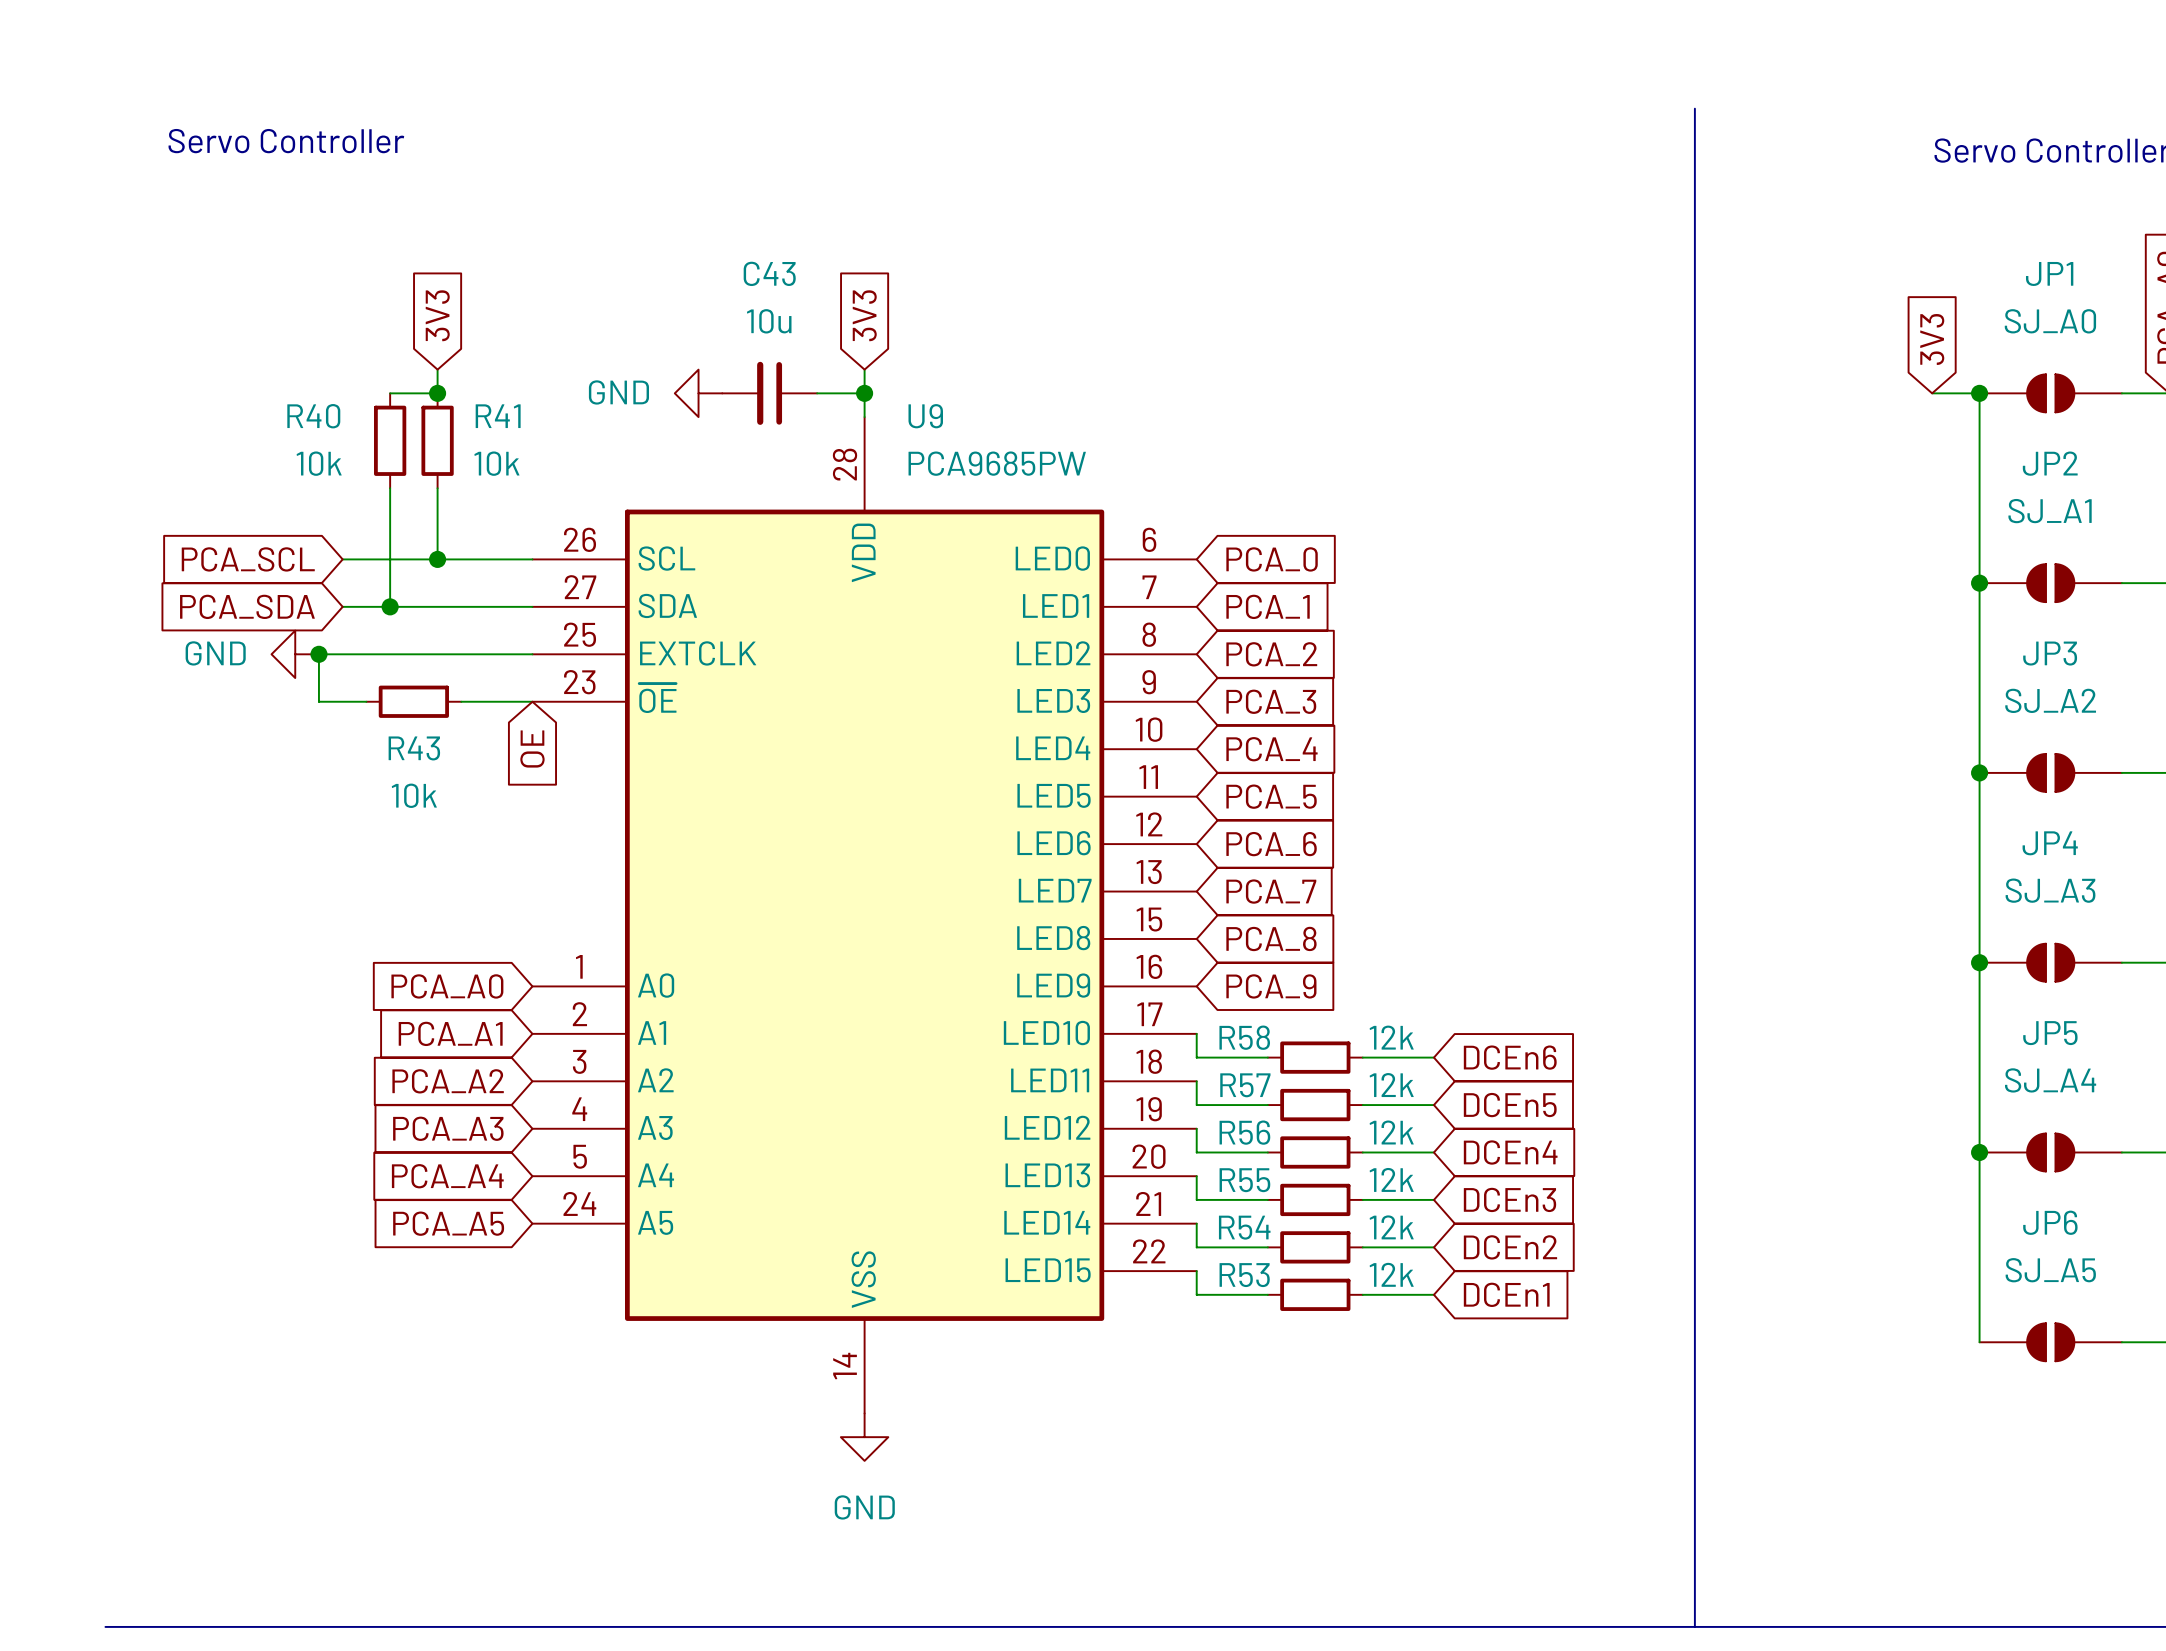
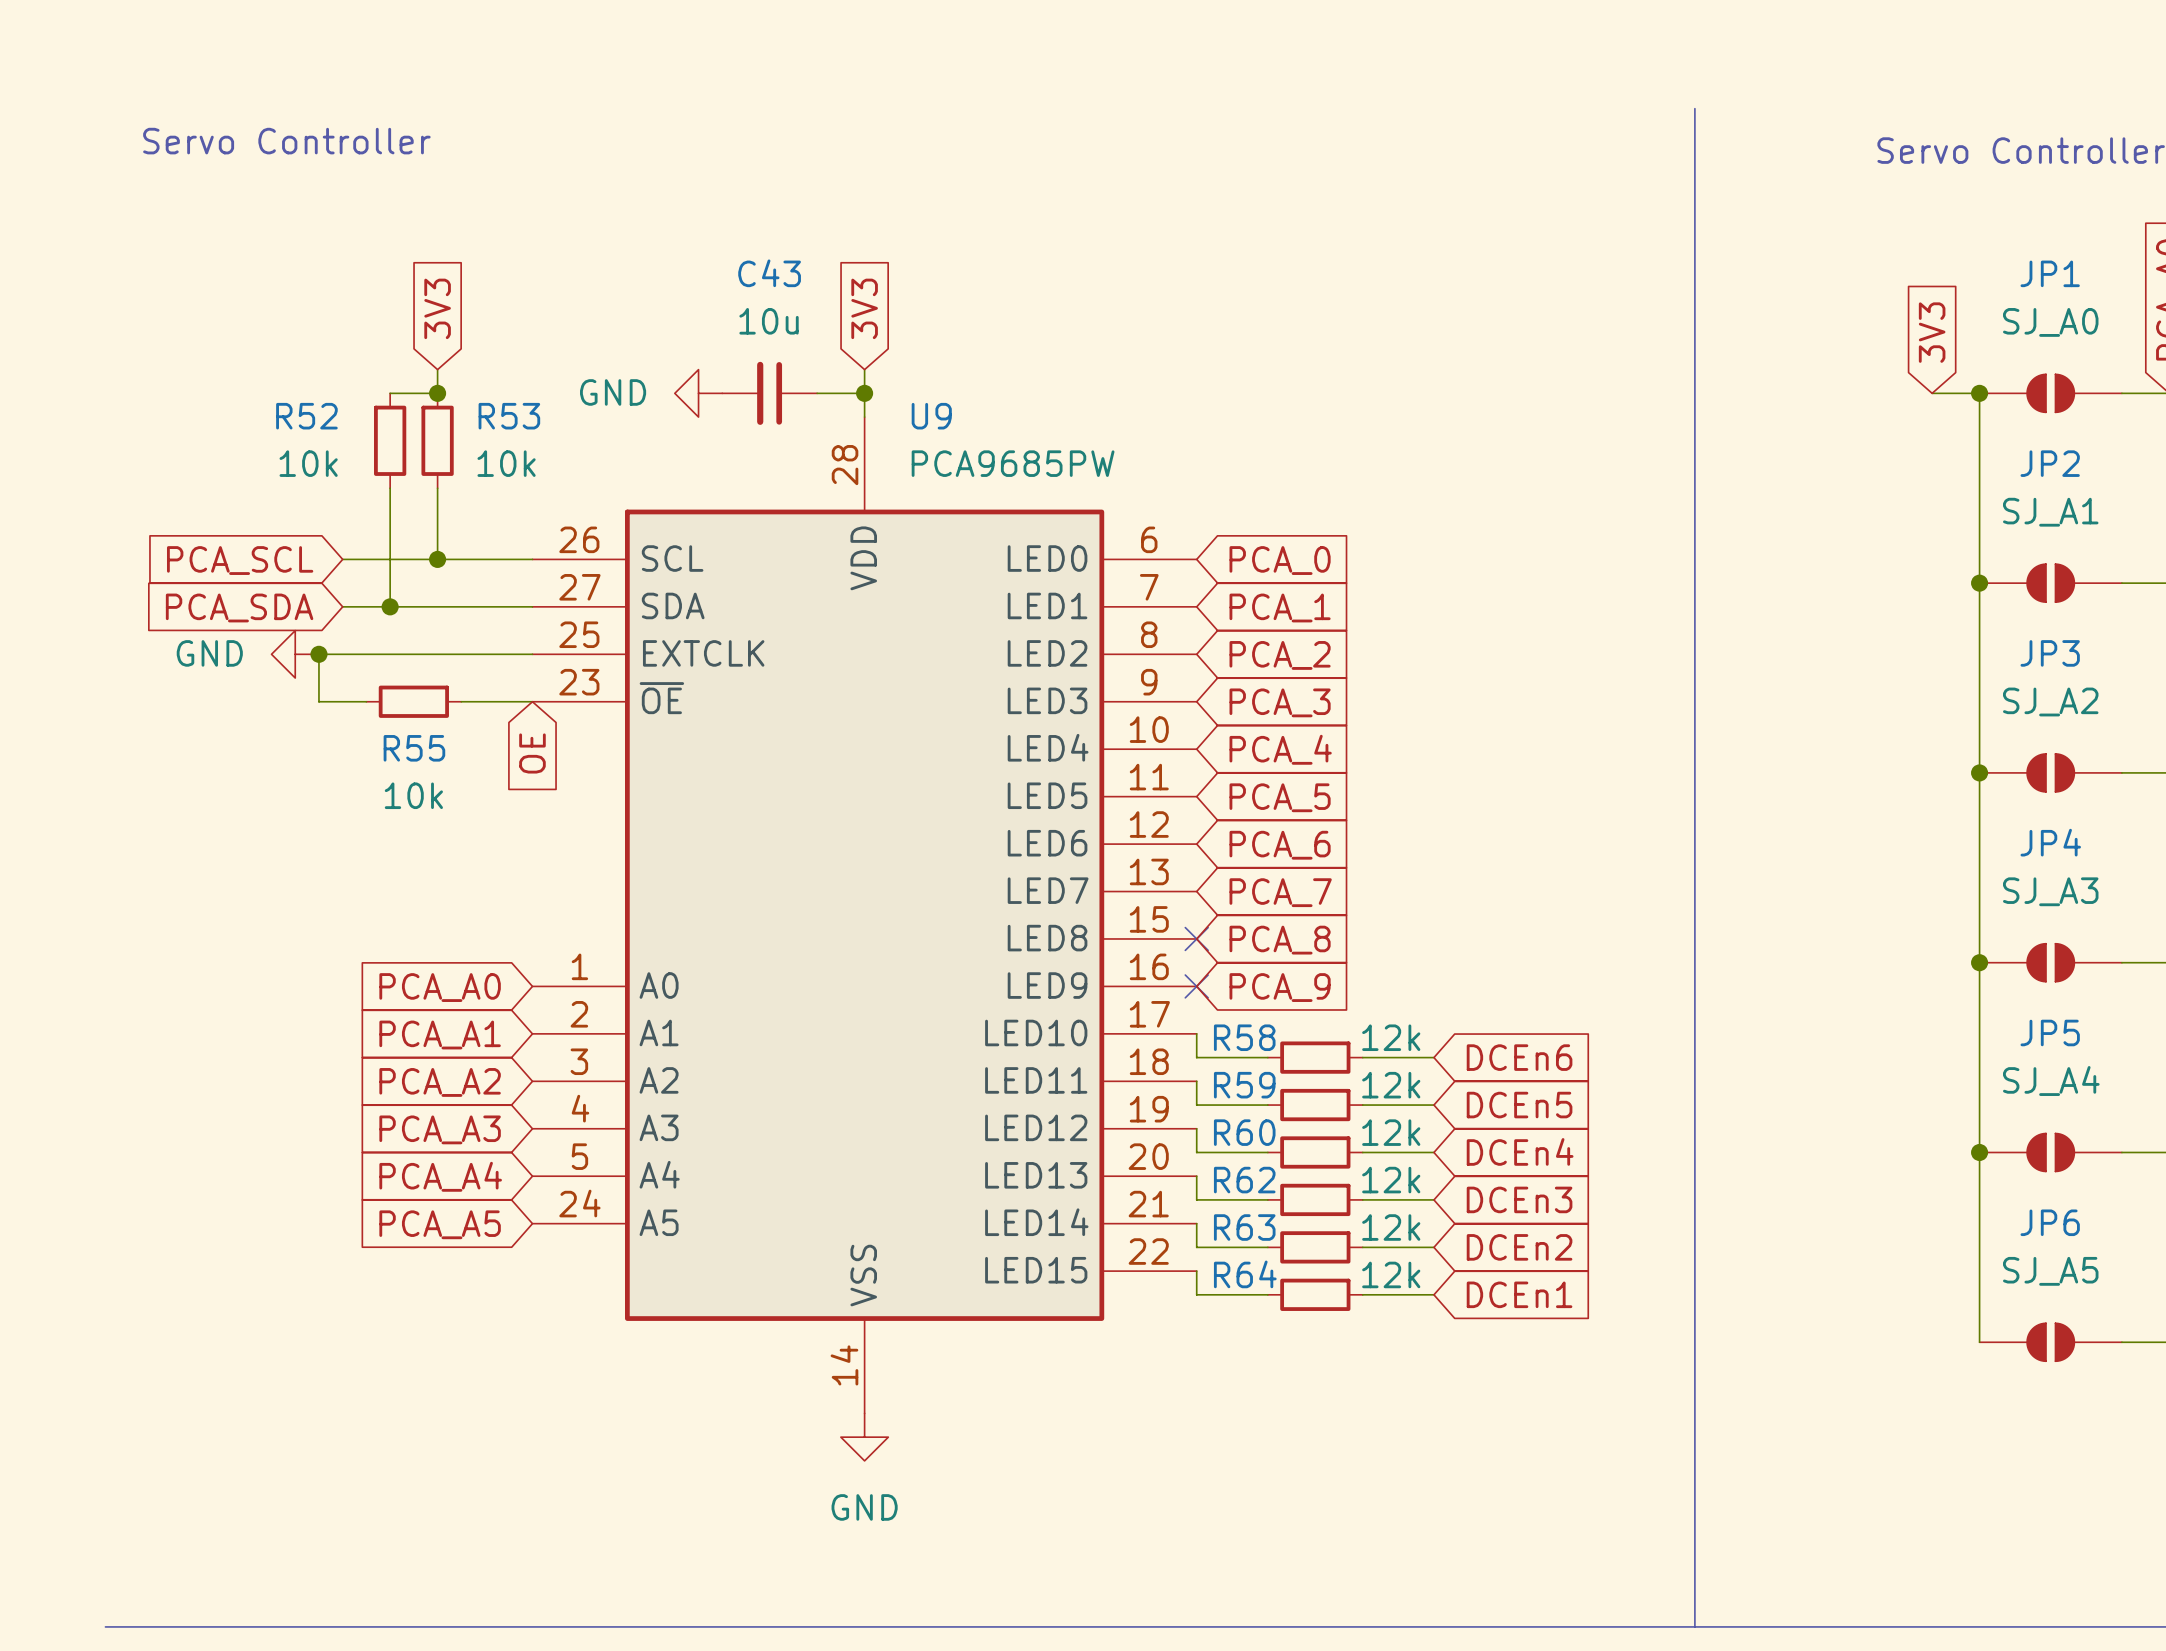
R40 name: R40 (313, 416) -> R52 (306, 416)
R41 name: R41 (498, 416) -> R53 (509, 416)
R43 name: R43 (414, 748) -> R55 (414, 748)
no-connect mark: none -> (1196, 938)
no-connect mark: none -> (1196, 986)
R57 name: R57 (1245, 1085) -> R59 (1244, 1085)
R56 name: R56 (1244, 1132) -> R60 (1244, 1132)
R55 name: R55 (1244, 1180) -> R62 (1244, 1180)
R54 name: R54 (1244, 1227) -> R63 (1244, 1227)
R53 name: R53 (1244, 1275) -> R64 (1245, 1274)

